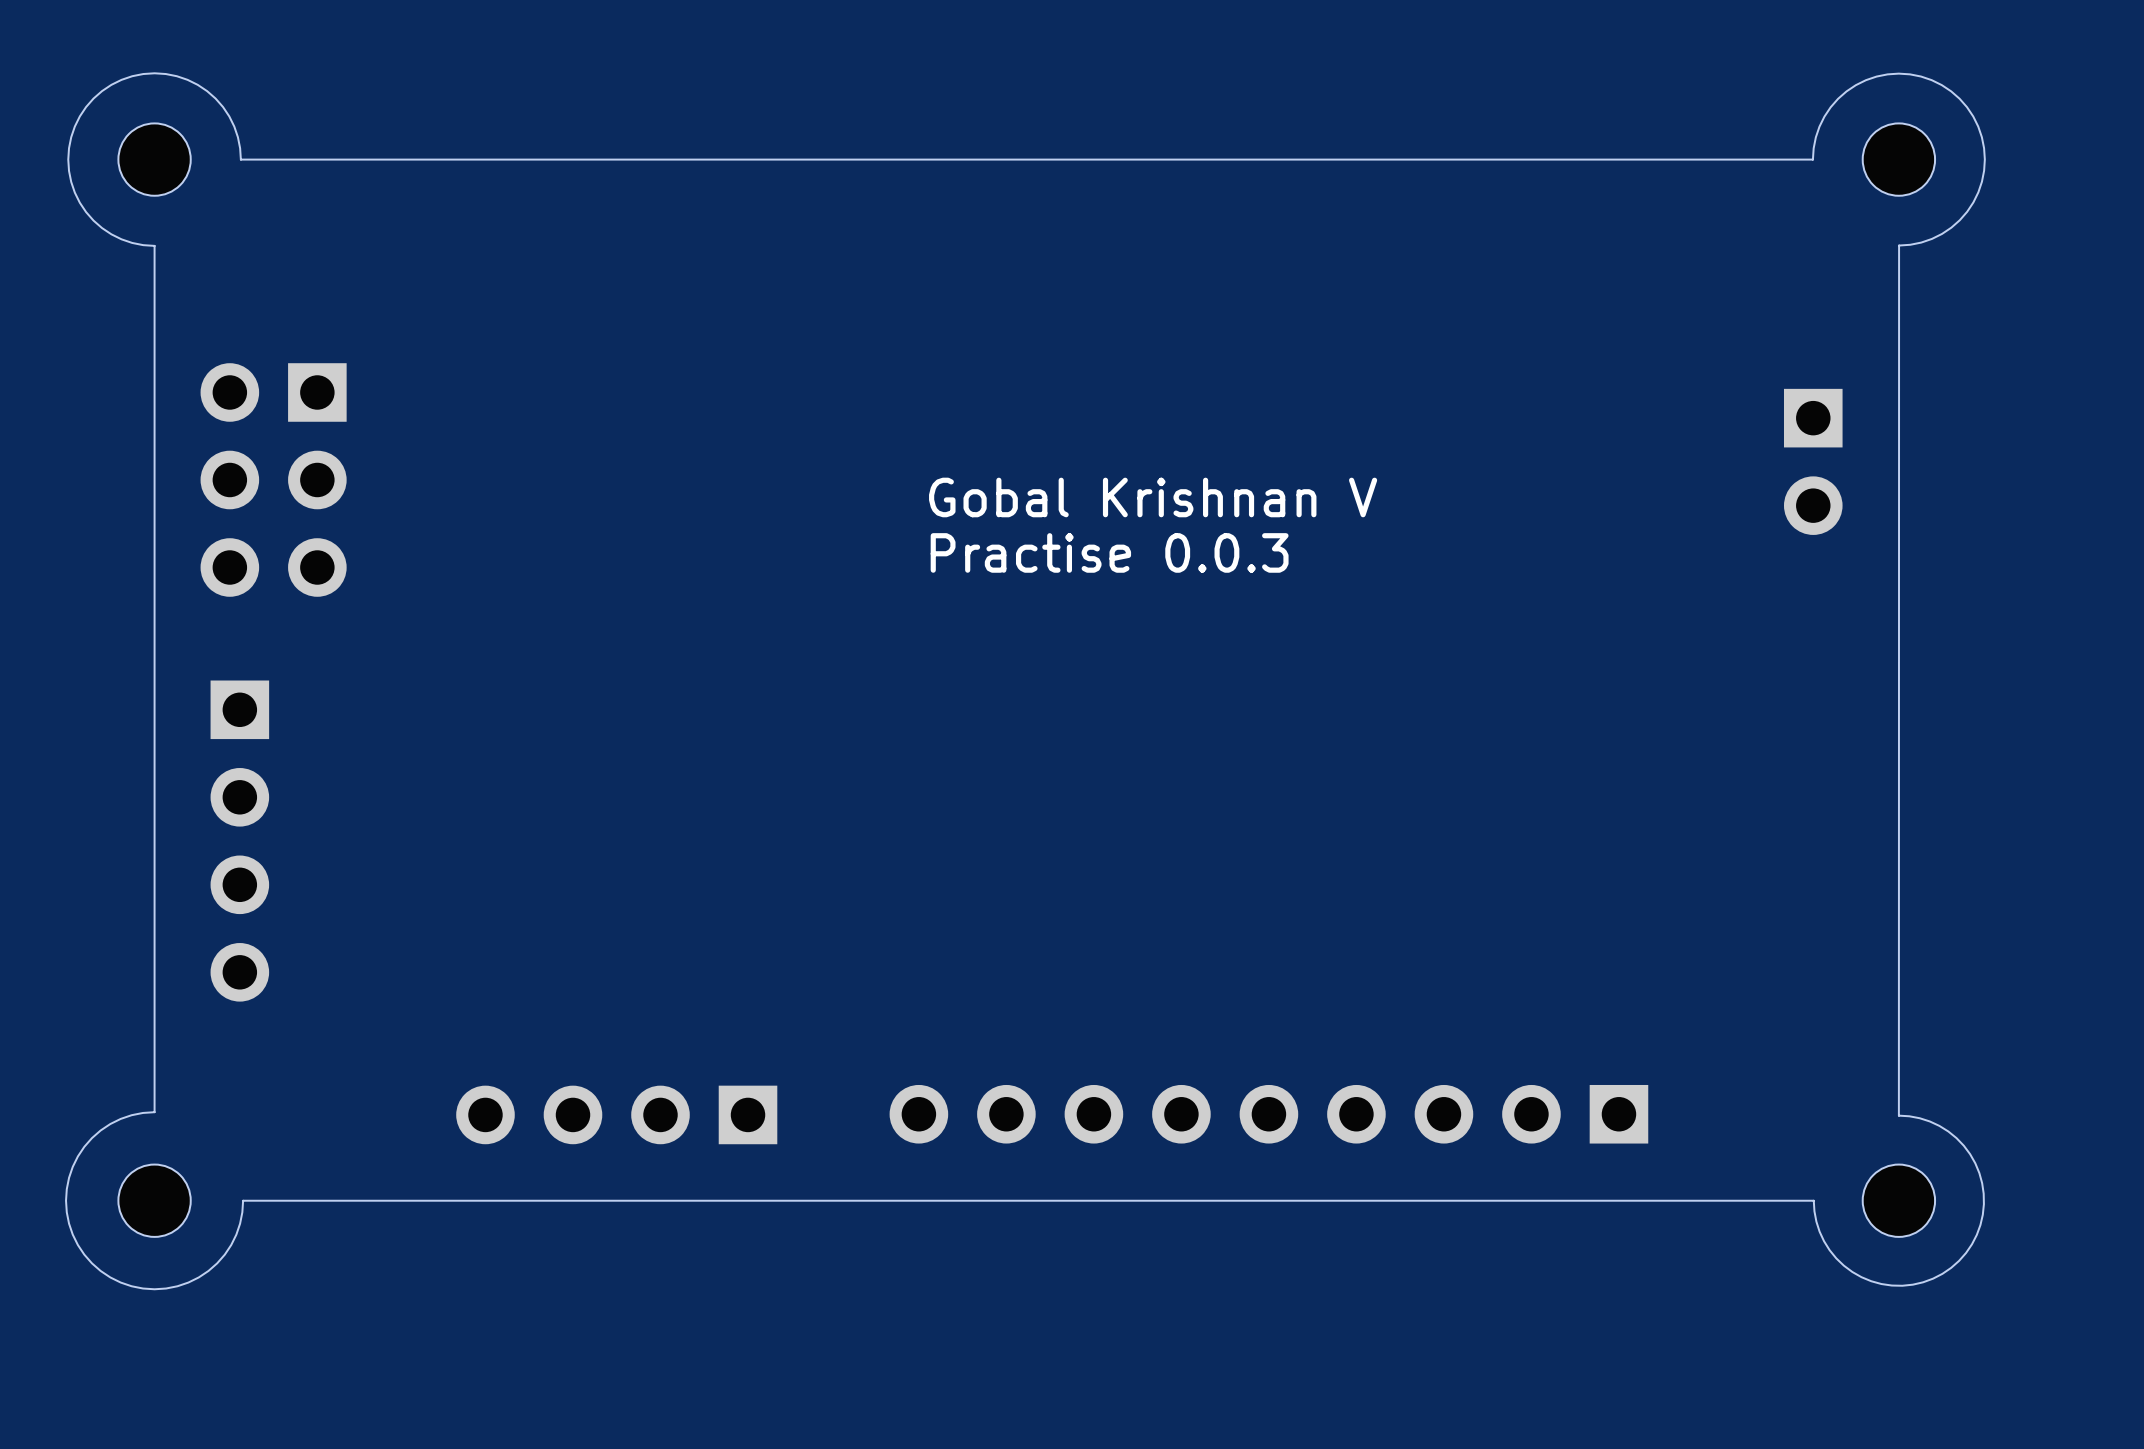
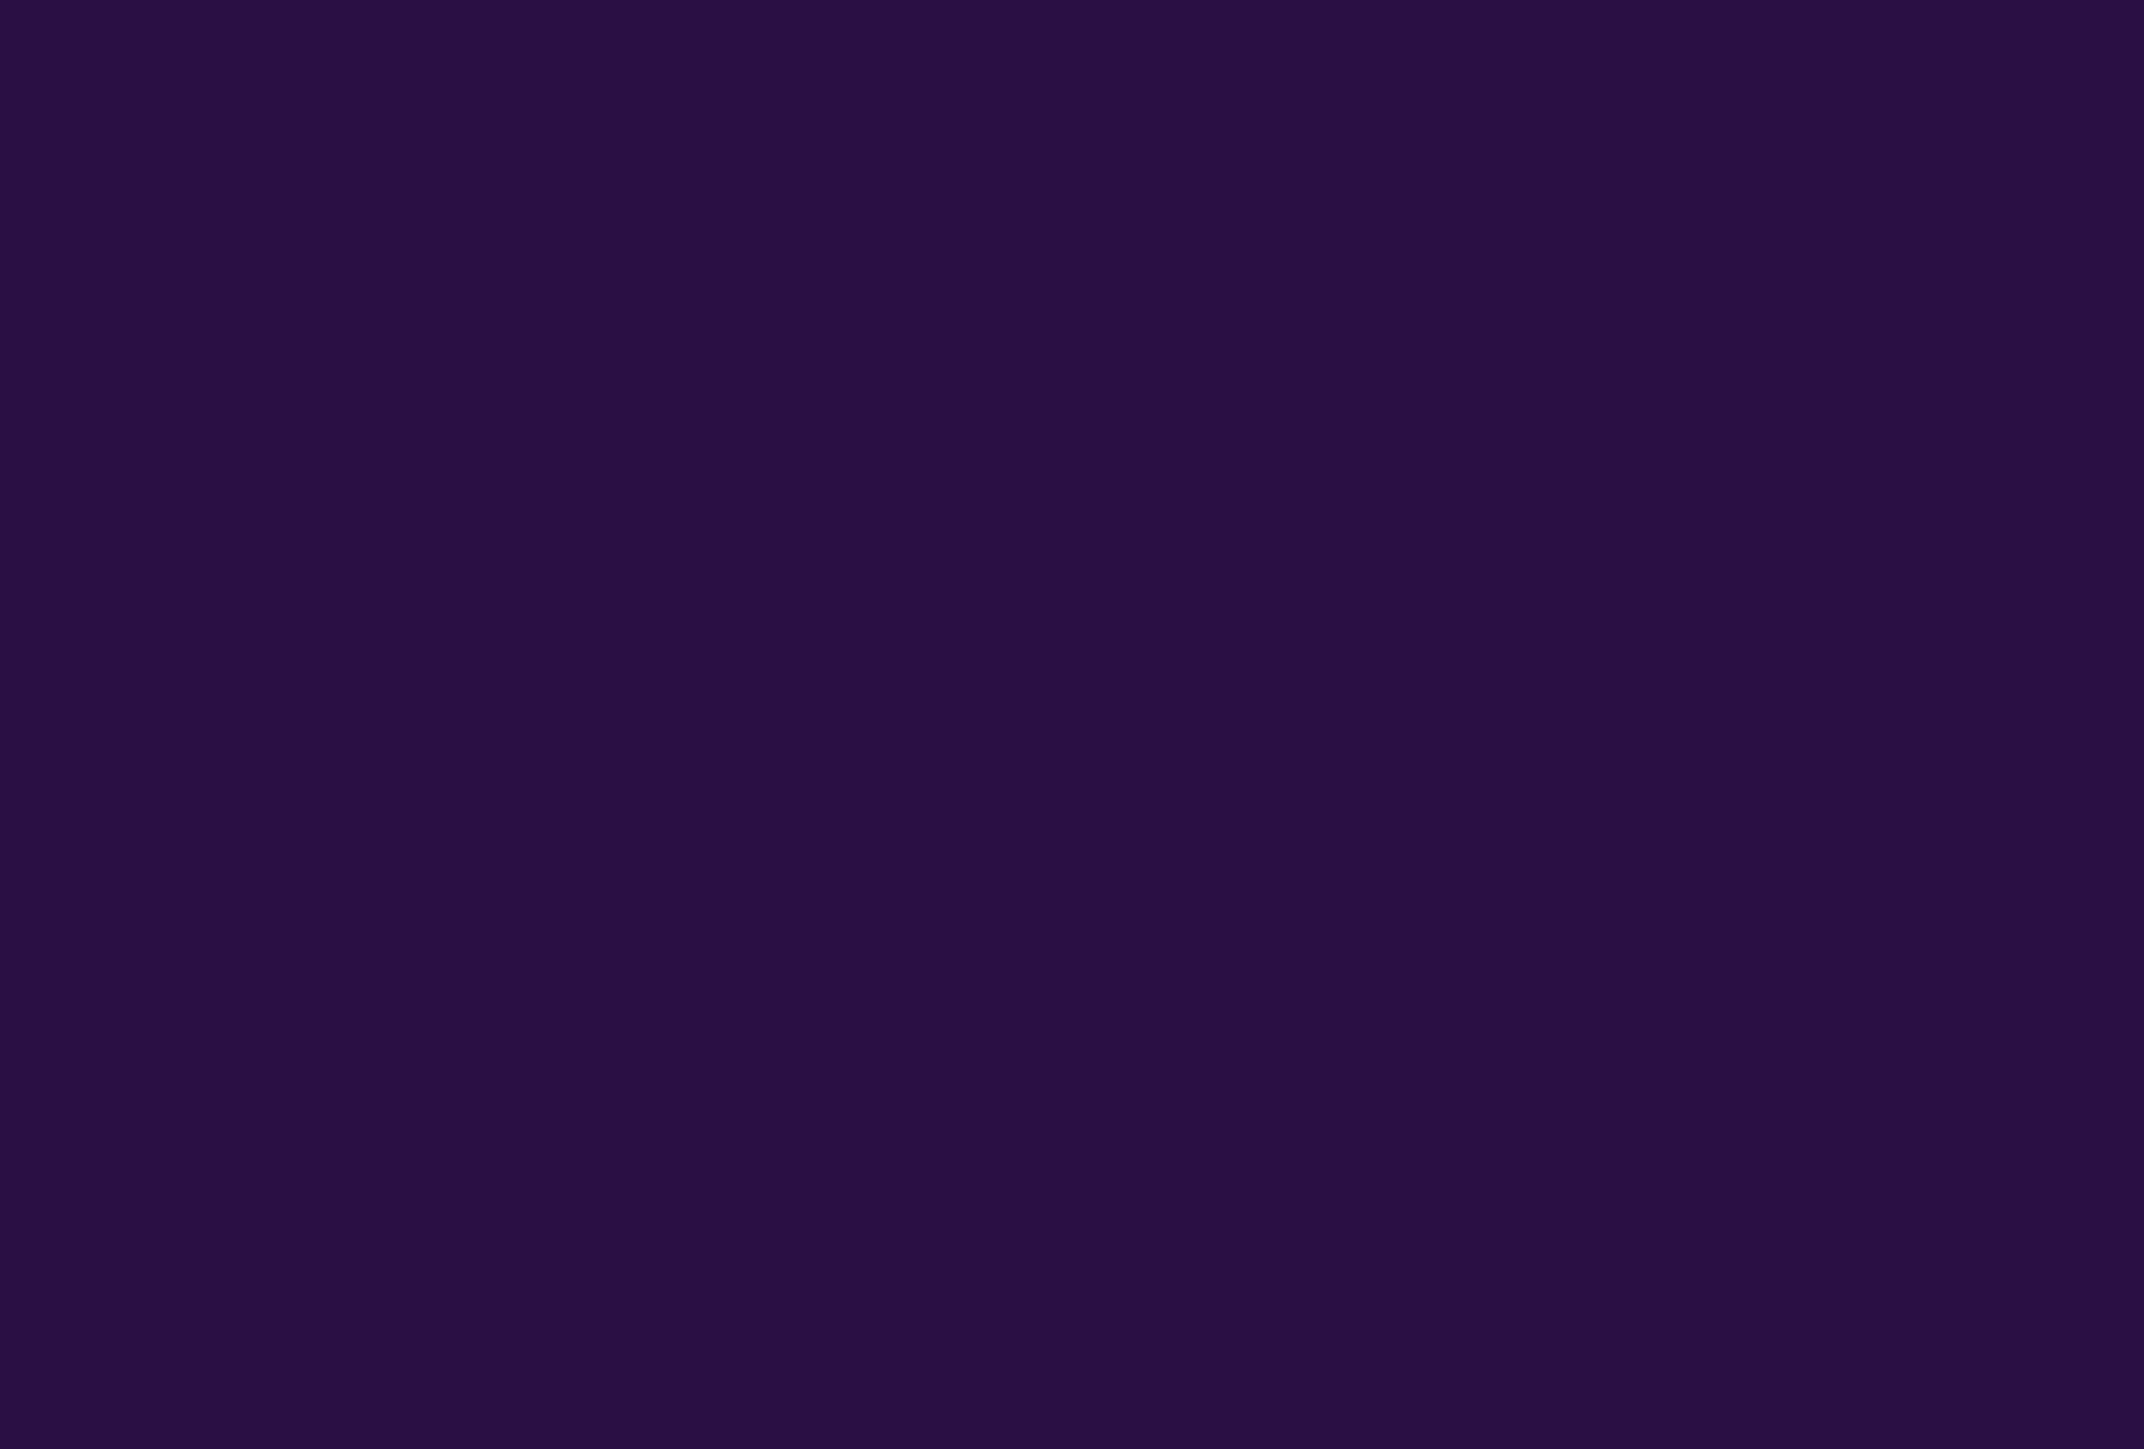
part: (154, 159) -> none
board edge: (1812, 159) (240, 159) (237, 137) (229, 116) (215, 98) (197, 84) (176, 76) (154, 73) (132, 76) (111, 84) (93, 98) (79, 116) (71, 137) (68, 159) (74, 192) (93, 220) (121, 239) (154, 245) (154, 1112) (131, 1115) (110, 1124) (91, 1138) (77, 1156) (69, 1177) (66, 1200) (69, 1223) (77, 1245) (91, 1263) (110, 1277) (131, 1286) (154, 1289) (166, 1288) (188, 1282) (198, 1277) (217, 1263) (231, 1245) (236, 1234) (240, 1223) (243, 1200) (1813, 1200) (1816, 1221) (1824, 1241) (1836, 1258) (1852, 1271) (1881, 1284) (1902, 1285) (1923, 1282) (1942, 1273) (1959, 1260) (1971, 1244) (1982, 1214) (1983, 1193) (1975, 1163) (1956, 1138) (1929, 1121) (1898, 1115) (1899, 245) (1931, 238) (1959, 220) (1978, 192) (1984, 170) (1984, 148) (1973, 116) (1951, 91) (1931, 80) (1898, 73) (1865, 80) (1838, 98) (1819, 126) (1812, 159) -> none
part: (1898, 159) -> none
part: (1813, 461) -> none
part: (273, 479) -> none
text: Gobal Krishnan V (1153, 497) -> none
text: Practise 0.0.3 (1109, 552) -> none
part: (239, 841) -> none
part: (616, 1114) -> none
part: (1268, 1114) -> none
part: (154, 1200) -> none
part: (1898, 1200) -> none

